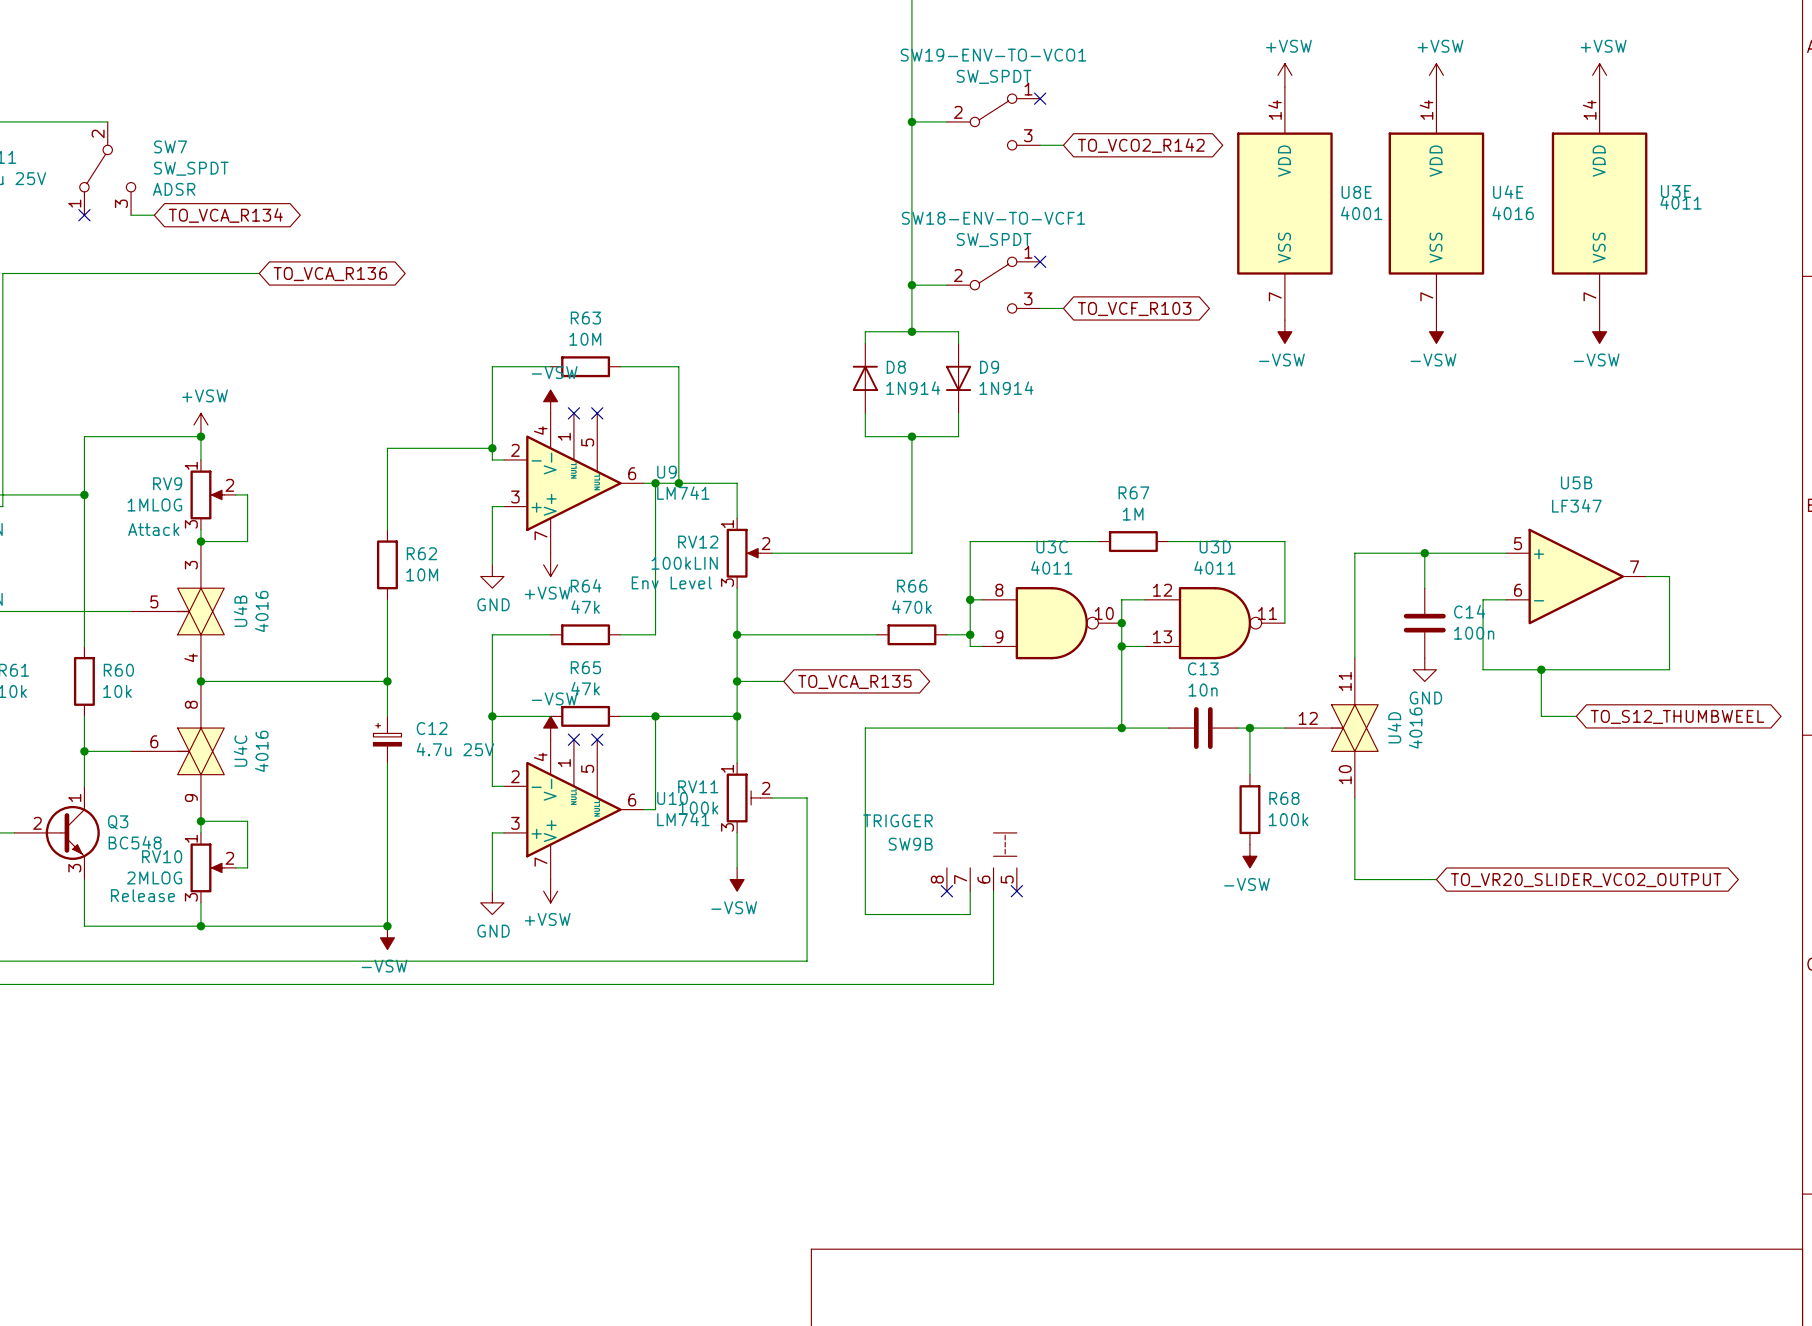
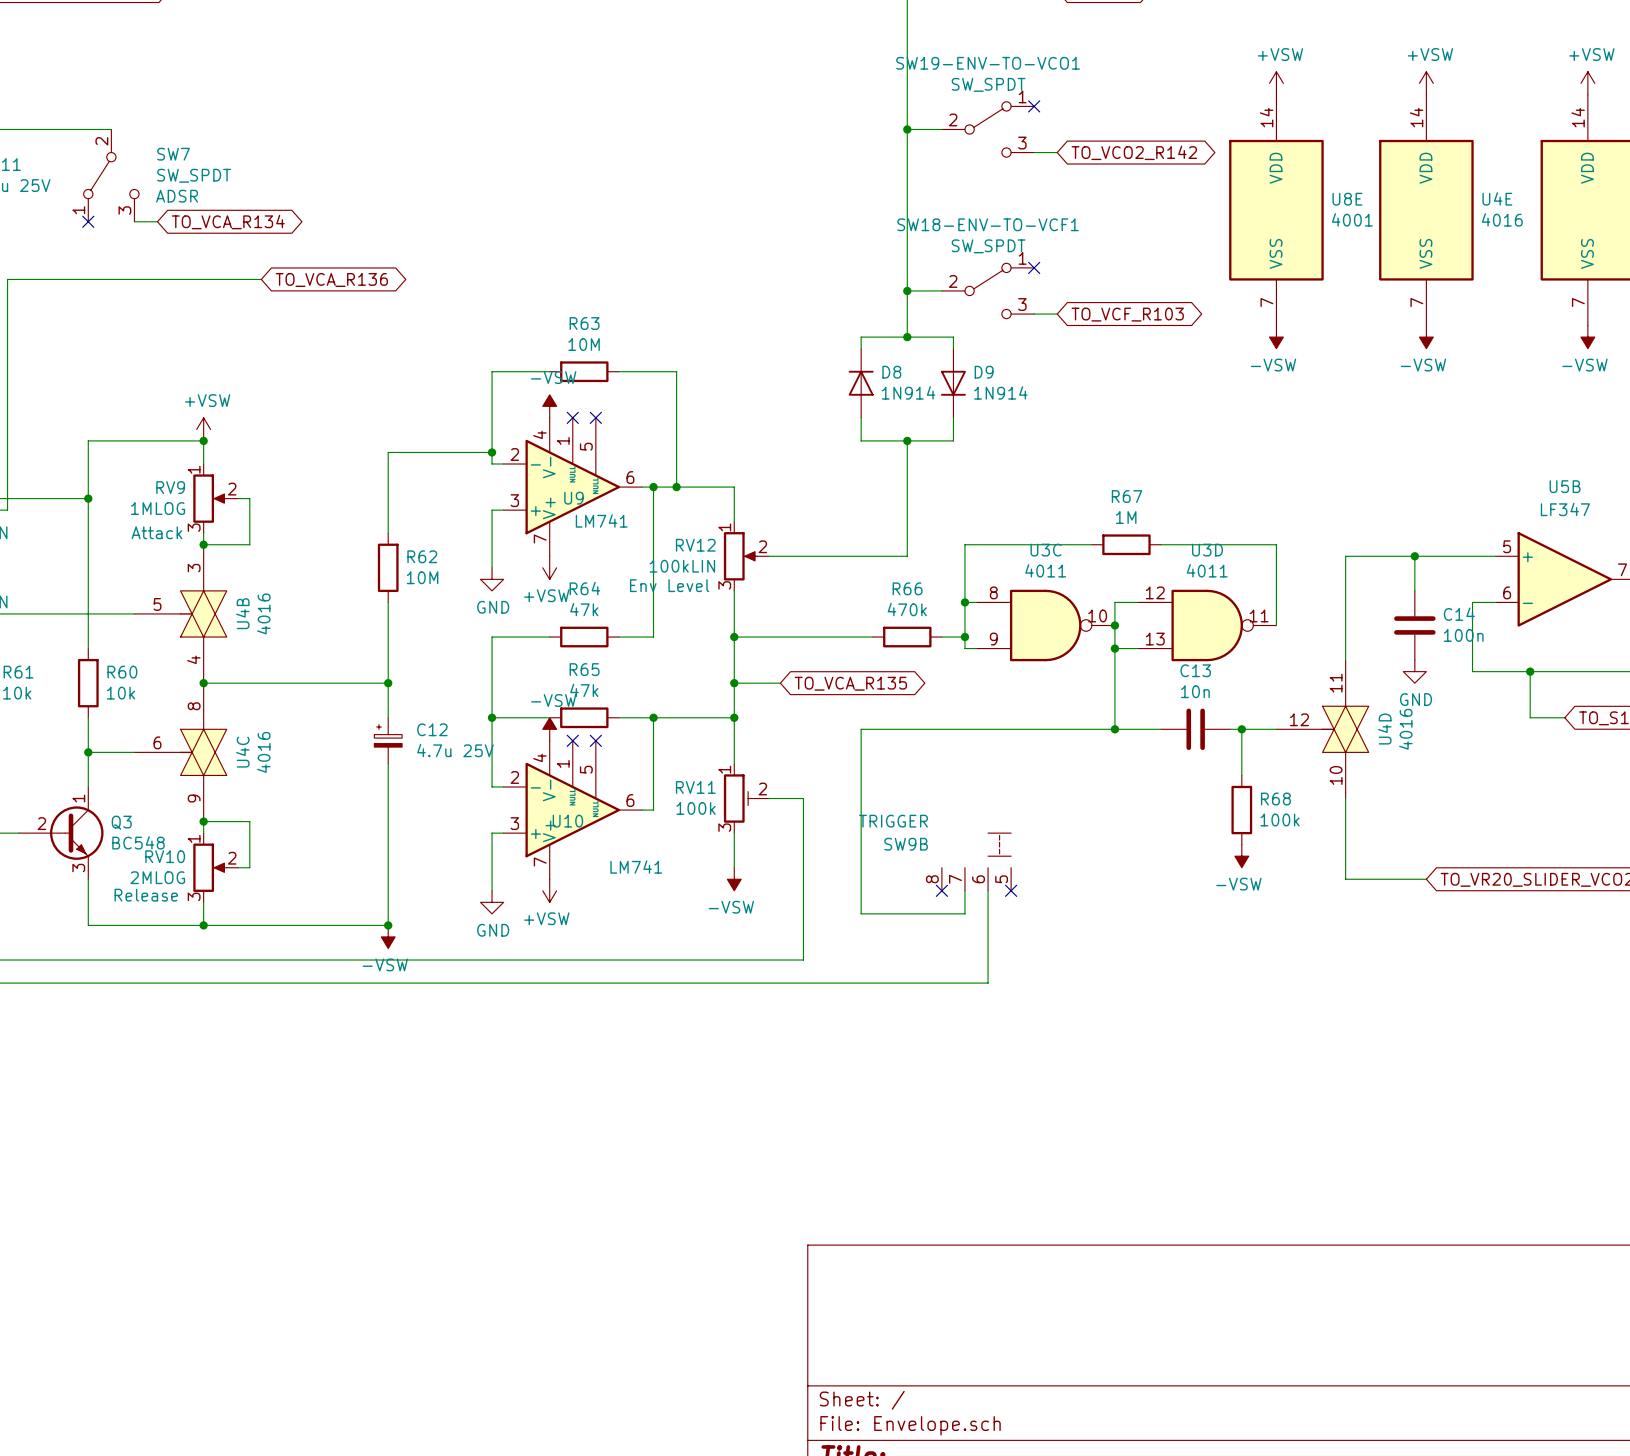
U9 name position: U9 (666, 472) -> U9 (573, 498)
U9 value position: LM741 (683, 493) -> LM741 (601, 520)
U10 name position: U10 (672, 798) -> U10 (567, 821)
U10 value position: LM741 (683, 819) -> LM741 (636, 867)

